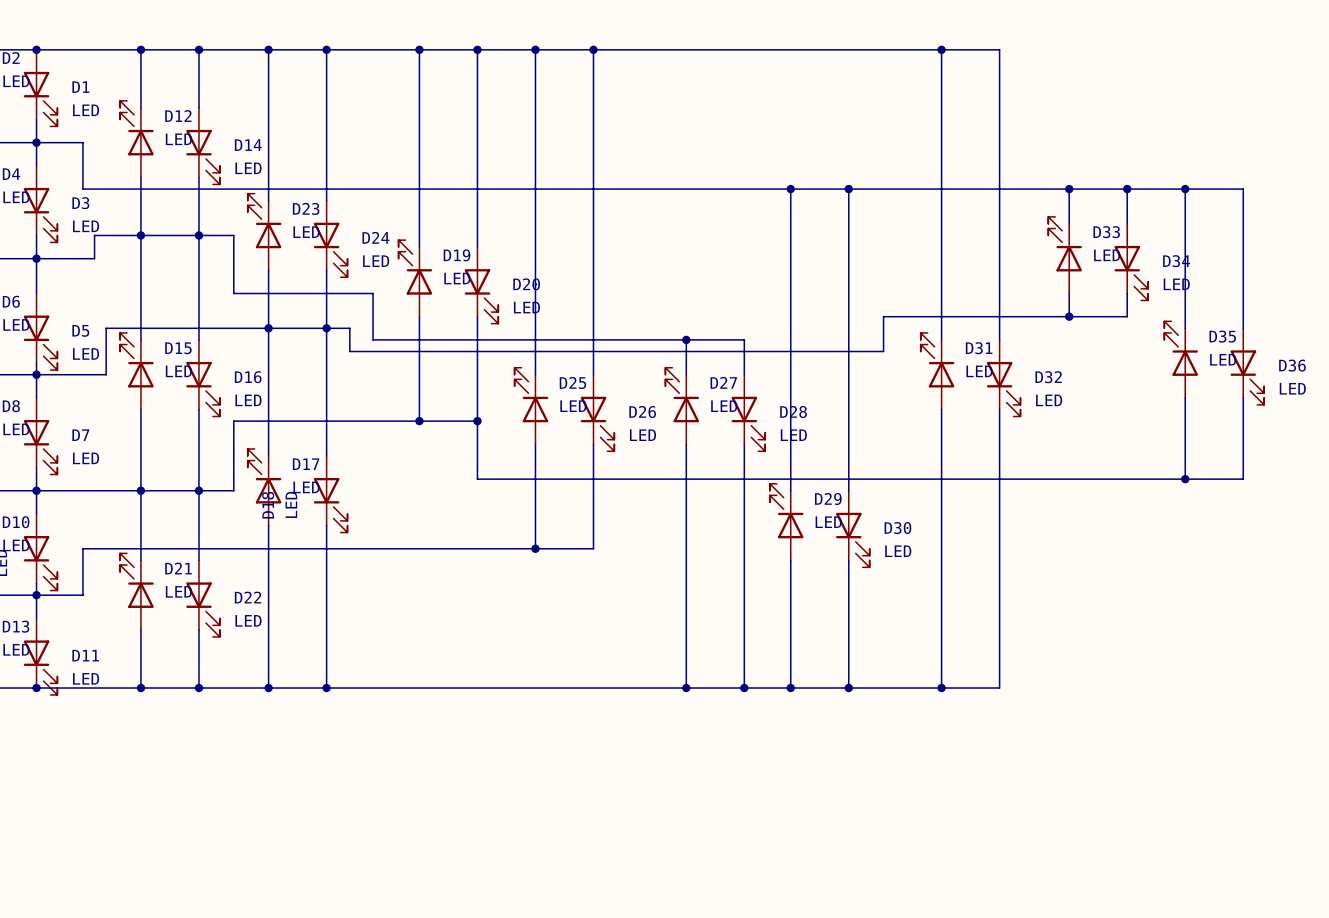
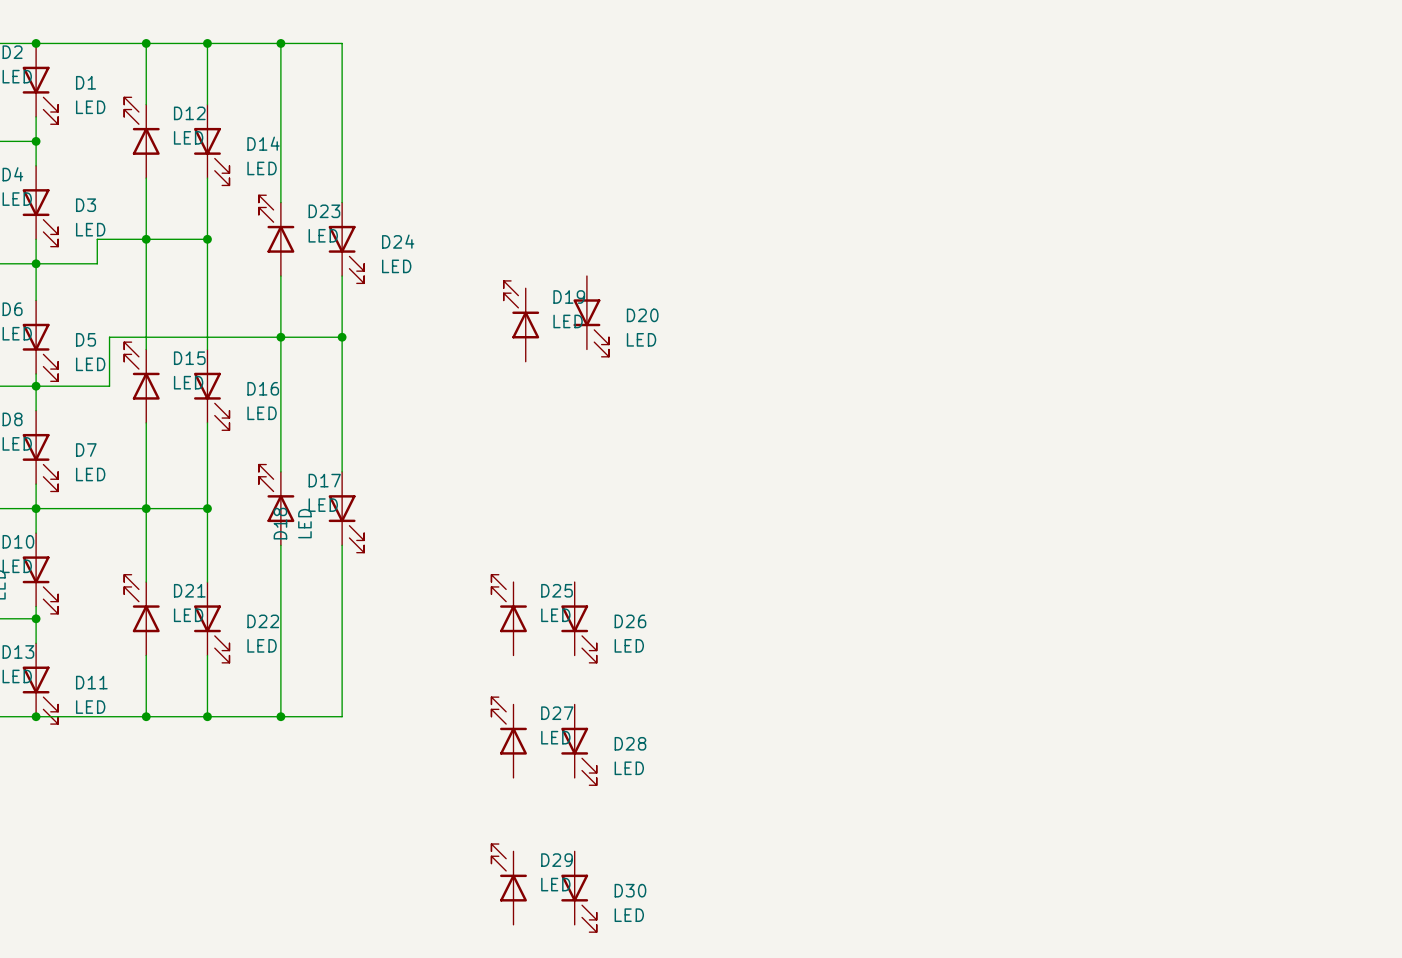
wire: (326, 49) (999, 49) (999, 339) -> none
junction: (326, 49) -> none
wire: (419, 49) (419, 247) -> none
junction: (419, 49) -> none
wire: (477, 49) (477, 247) -> none
junction: (477, 49) -> none
wire: (535, 49) (535, 374) -> none
junction: (535, 49) -> none
wire: (593, 49) (593, 374) -> none
junction: (593, 49) -> none
wire: (941, 49) (941, 339) -> none
junction: (941, 49) -> none
wire: (36, 142) (82, 142) (82, 189) (1243, 189) (1243, 328) -> none
wire: (790, 189) (790, 490) -> none
junction: (790, 189) -> none
wire: (848, 189) (848, 490) -> none
junction: (848, 189) -> none
wire: (1069, 189) (1069, 223) -> none
junction: (1069, 189) -> none
wire: (1127, 189) (1127, 223) -> none
junction: (1127, 189) -> none
wire: (1185, 189) (1185, 328) -> none
junction: (1185, 189) -> none
wire: (198, 235) (233, 235) (233, 293) (373, 293) (373, 339) (744, 339) (744, 374) -> none
D33: LED (1065, 255) -> none
D34: LED (1131, 262) -> none
D19 position: (415, 278) -> (521, 321)
D20 position: (481, 285) -> (591, 316)
wire: (1069, 293) (1069, 316) -> none
wire: (1127, 293) (1127, 316) (883, 316) (883, 351) (349, 351) (349, 328) (326, 328) -> none
wire: (419, 316) (419, 421) -> none
wire: (477, 316) (477, 479) (1243, 479) (1243, 397) -> none
junction: (1069, 316) -> none
wire: (686, 339) (686, 374) -> none
junction: (686, 339) -> none
D35: LED (1181, 359) -> none
D36: LED (1247, 366) -> none
D31: LED (937, 371) -> none
D32: LED (1003, 378) -> none
wire: (1185, 397) (1185, 479) -> none
D25 position: (531, 406) -> (509, 615)
D27 position: (682, 406) -> (509, 737)
wire: (941, 409) (941, 688) -> none
wire: (999, 409) (999, 688) (326, 688) -> none
D26 position: (597, 413) -> (578, 622)
D28 position: (748, 413) -> (578, 744)
junction: (419, 421) -> none
wire: (477, 421) (233, 421) (233, 490) (198, 490) -> none
junction: (477, 421) -> none
wire: (535, 444) (535, 548) -> none
wire: (593, 444) (593, 548) (82, 548) (82, 595) (36, 595) -> none
wire: (686, 444) (686, 688) -> none
wire: (744, 444) (744, 688) -> none
junction: (1185, 479) -> none
D29 position: (786, 522) -> (509, 884)
D30 position: (852, 529) -> (578, 891)
junction: (535, 548) -> none
wire: (790, 560) (790, 688) -> none
wire: (848, 560) (848, 688) -> none
junction: (326, 688) -> none
junction: (686, 688) -> none
junction: (744, 688) -> none
junction: (790, 688) -> none
junction: (848, 688) -> none
junction: (941, 688) -> none

